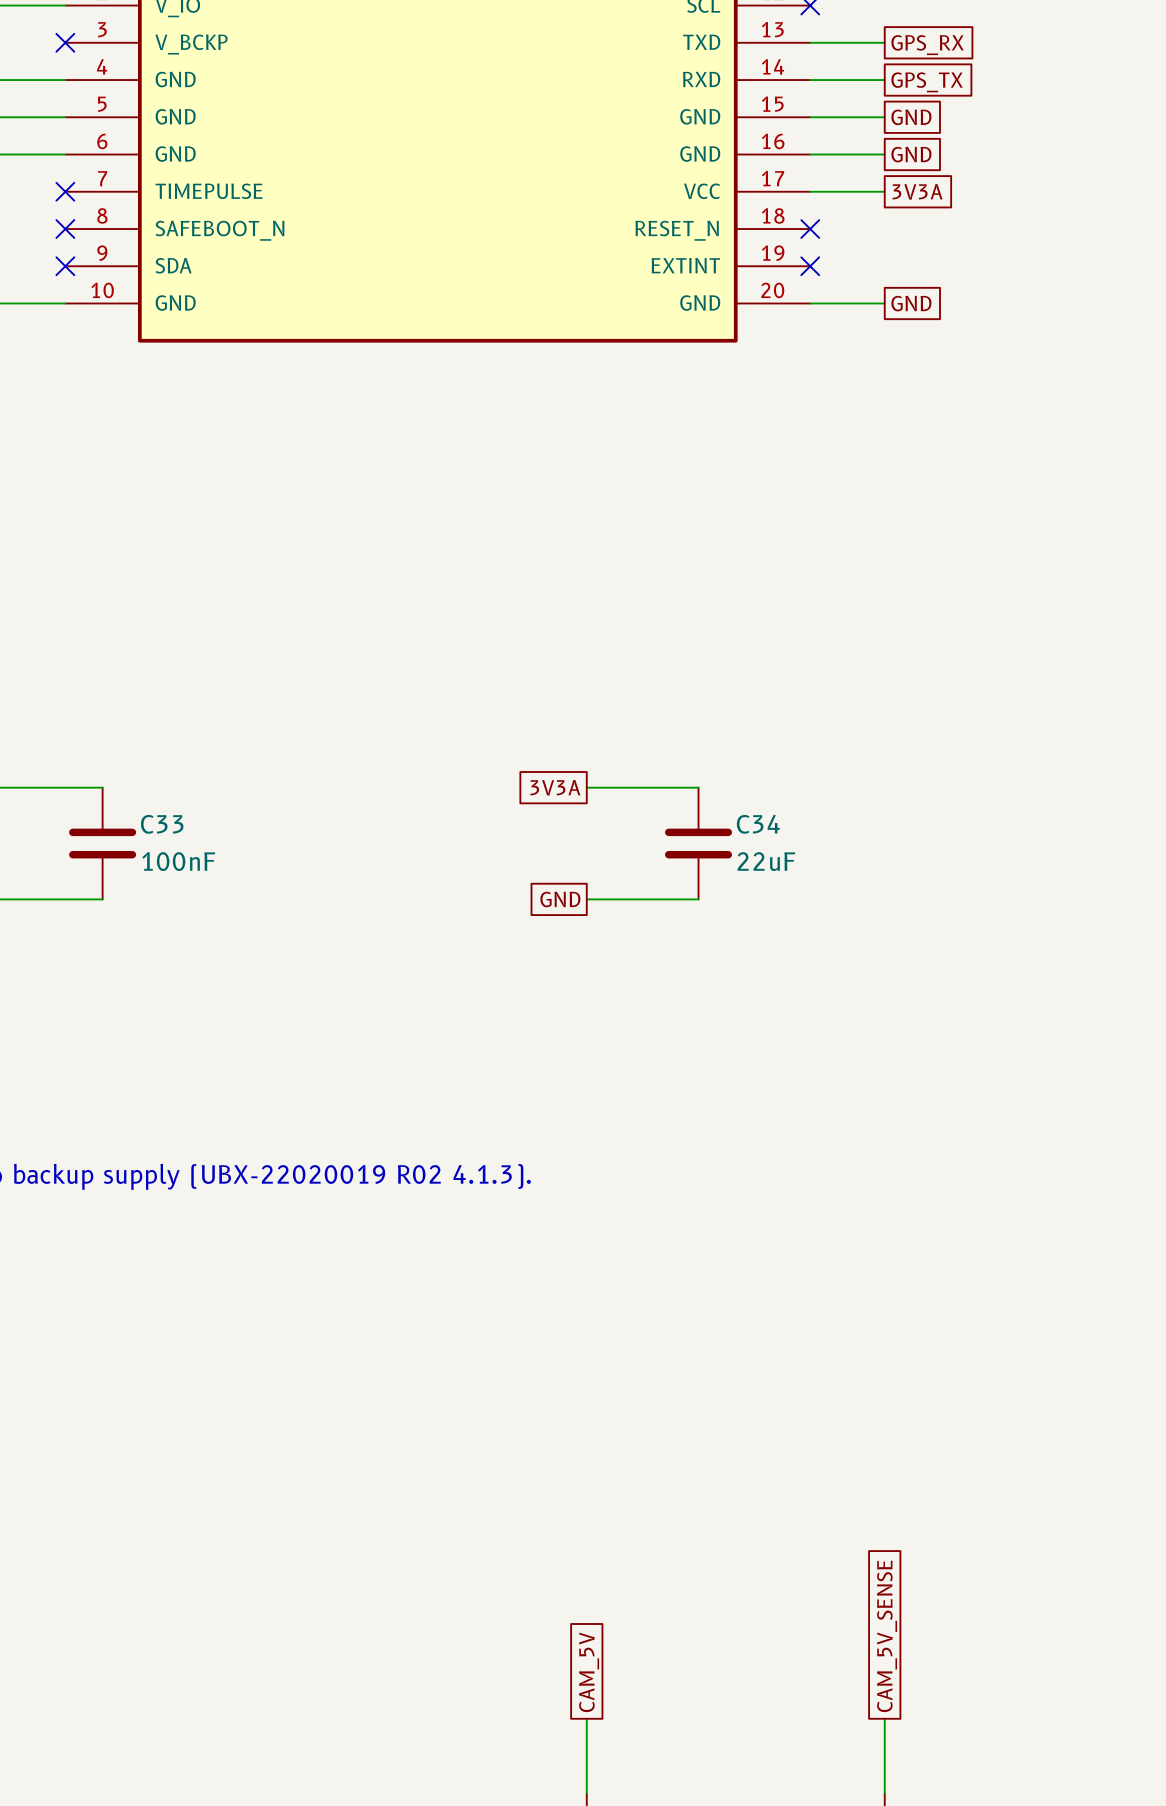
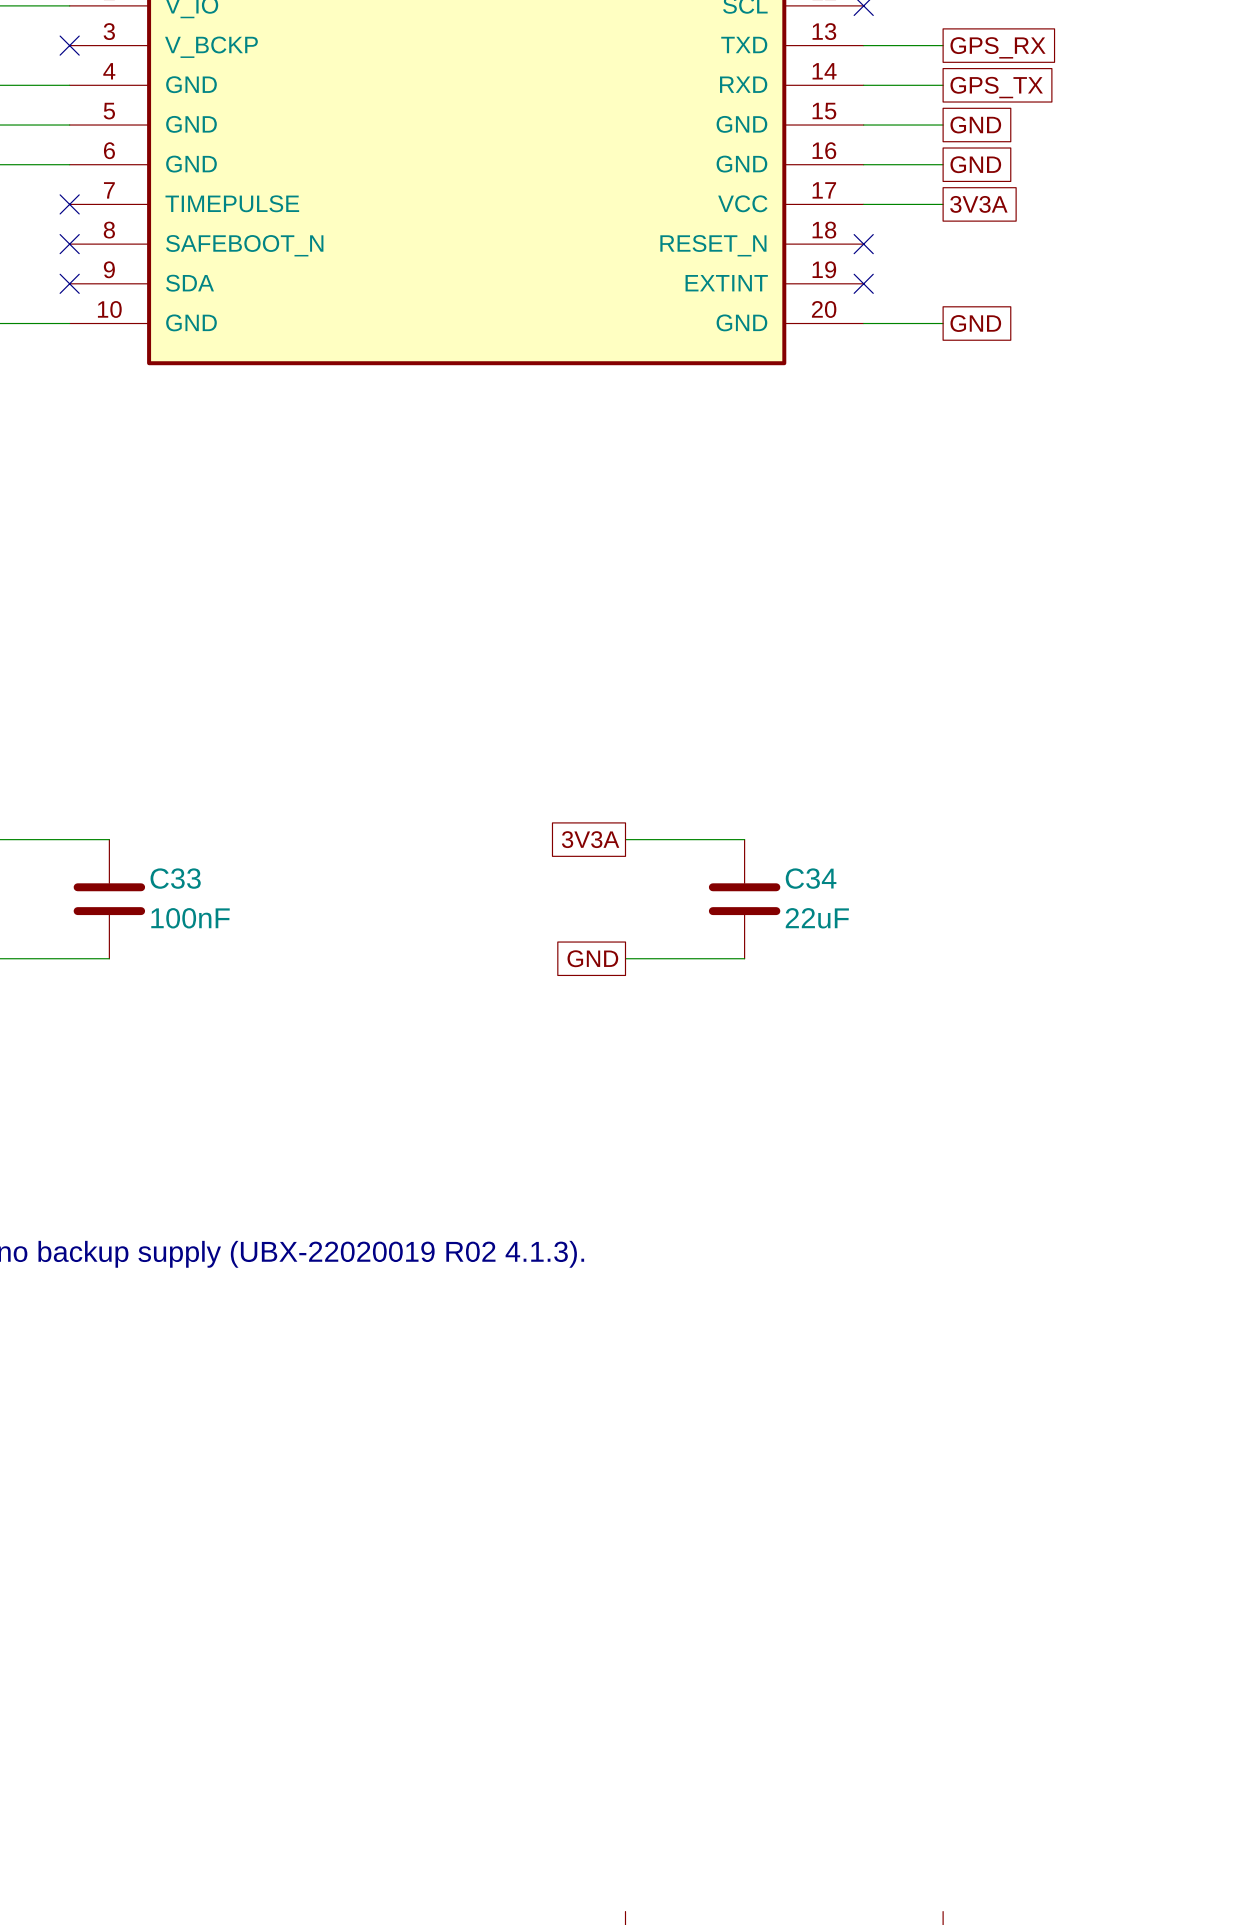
global label: CAM_5V_SENSE (887, 1636) -> none
global label: CAM_5V (589, 1672) -> none
wire: (586, 1718) (586, 1793) -> none
wire: (884, 1718) (884, 1793) -> none

